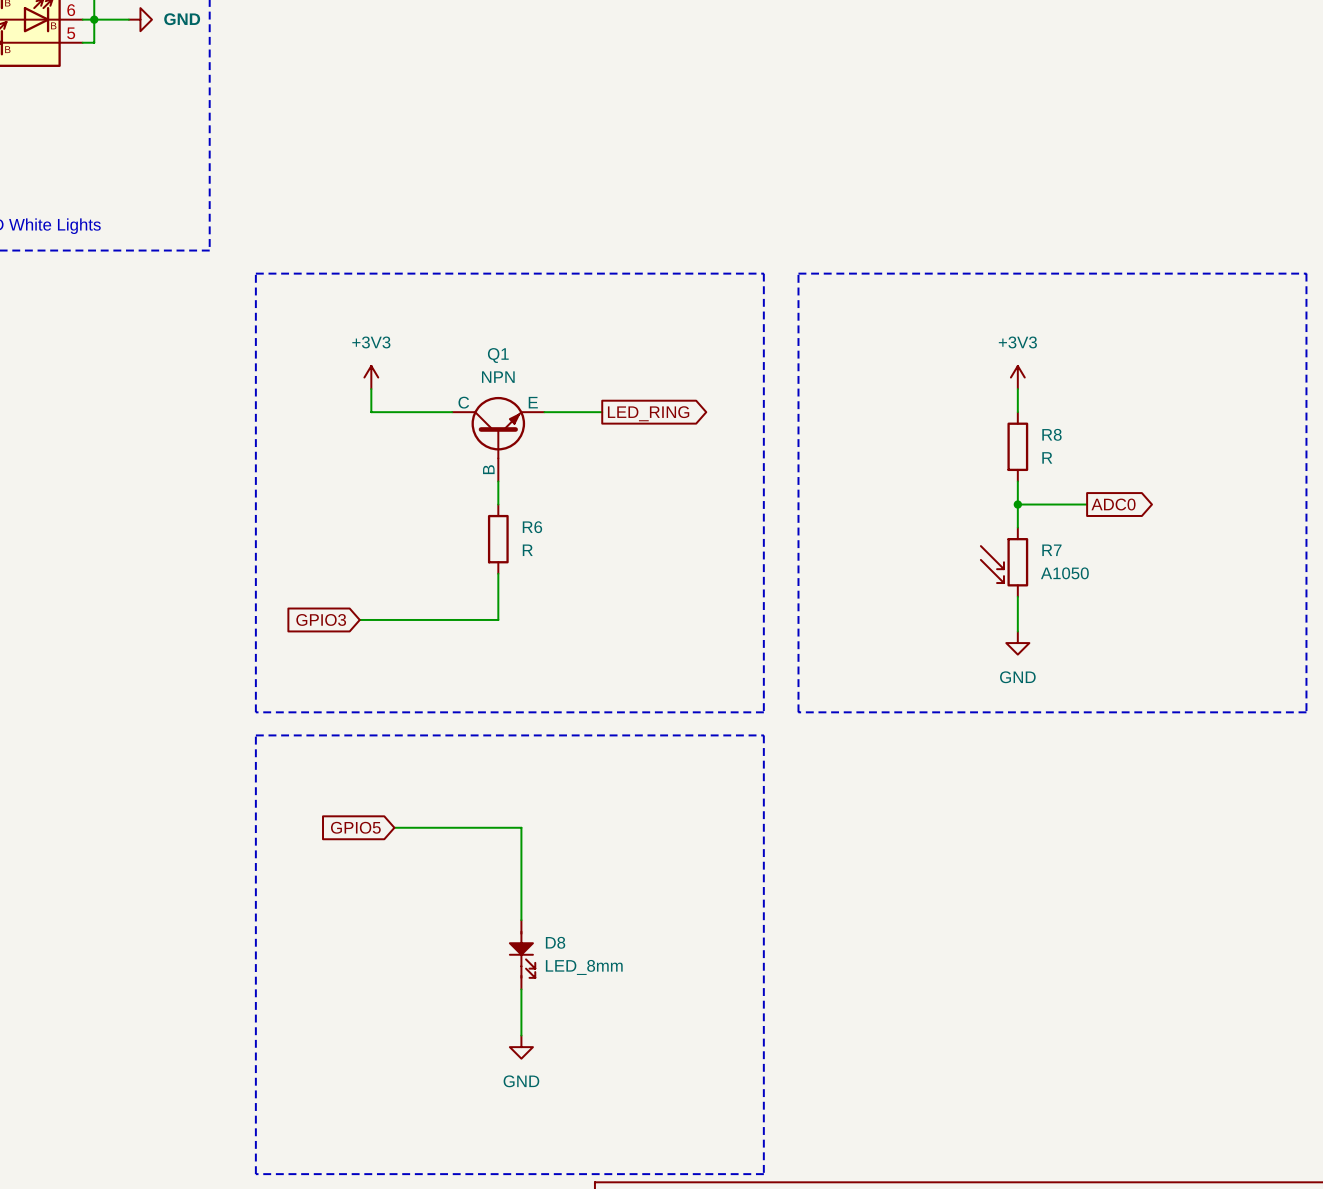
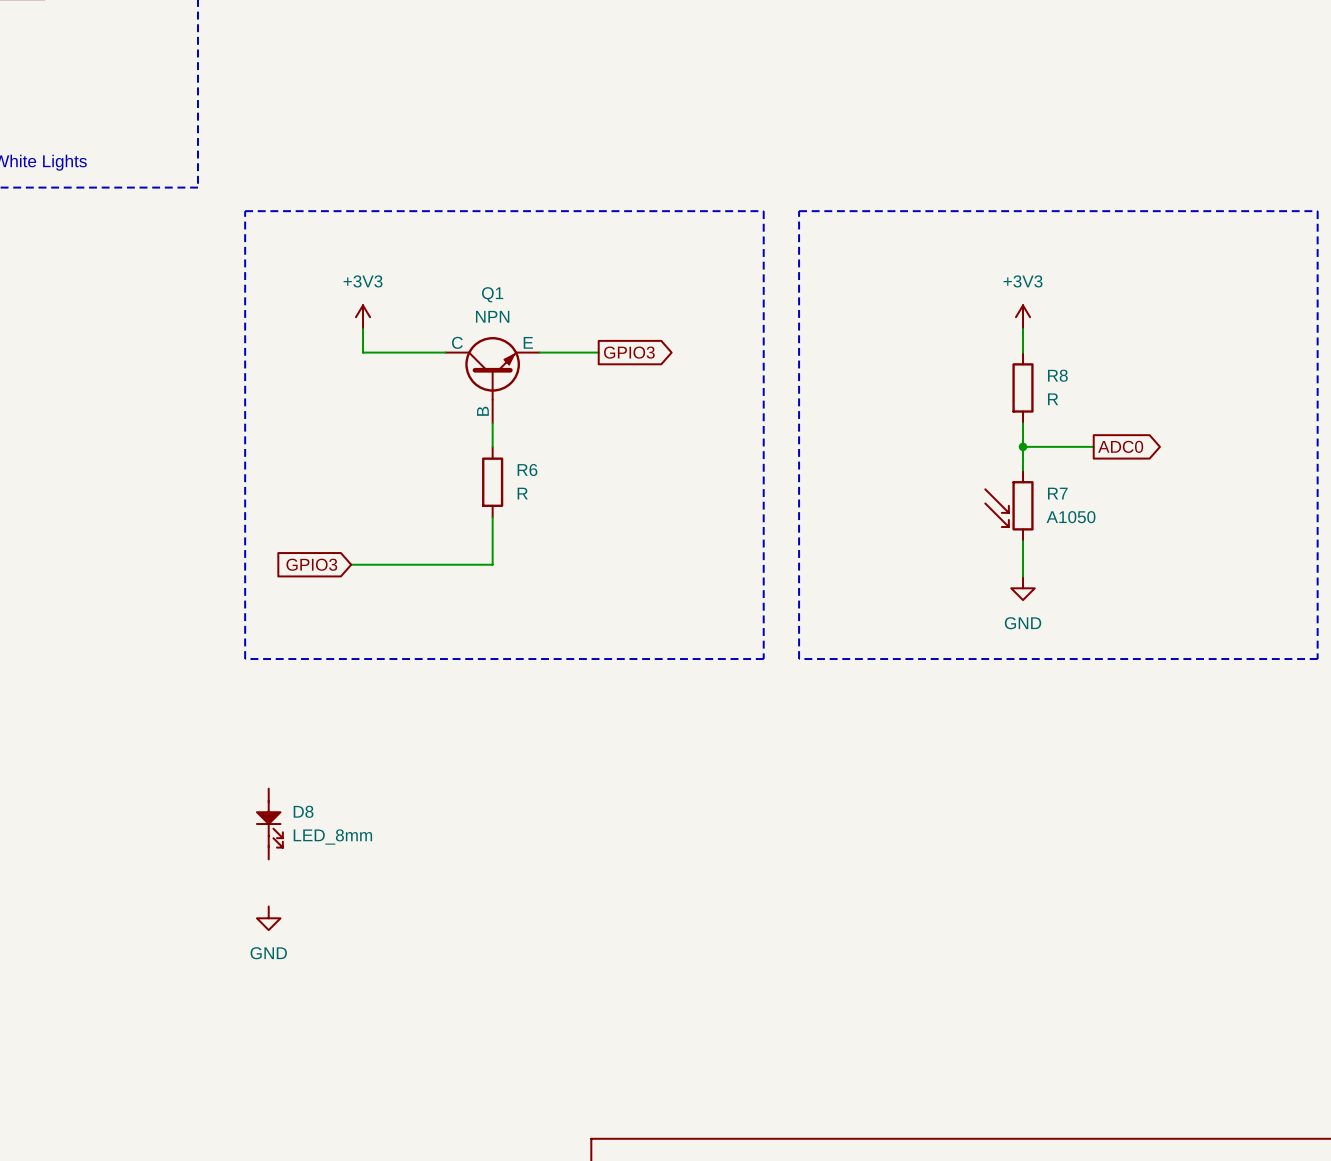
global label: LED_RING (648, 413) -> GPIO3 (629, 352)
line: (255, 735) (763, 735) (763, 1174) (255, 1174) (255, 735) -> none
global label: GPIO5 (355, 827) -> none
wire: (394, 827) (521, 827) (521, 920) -> none
D8 position: (522, 954) -> (269, 824)
power symbol: none -> GND (268, 918)
wire: (521, 989) (521, 1035) -> none
power symbol: GND (521, 1047) -> none

